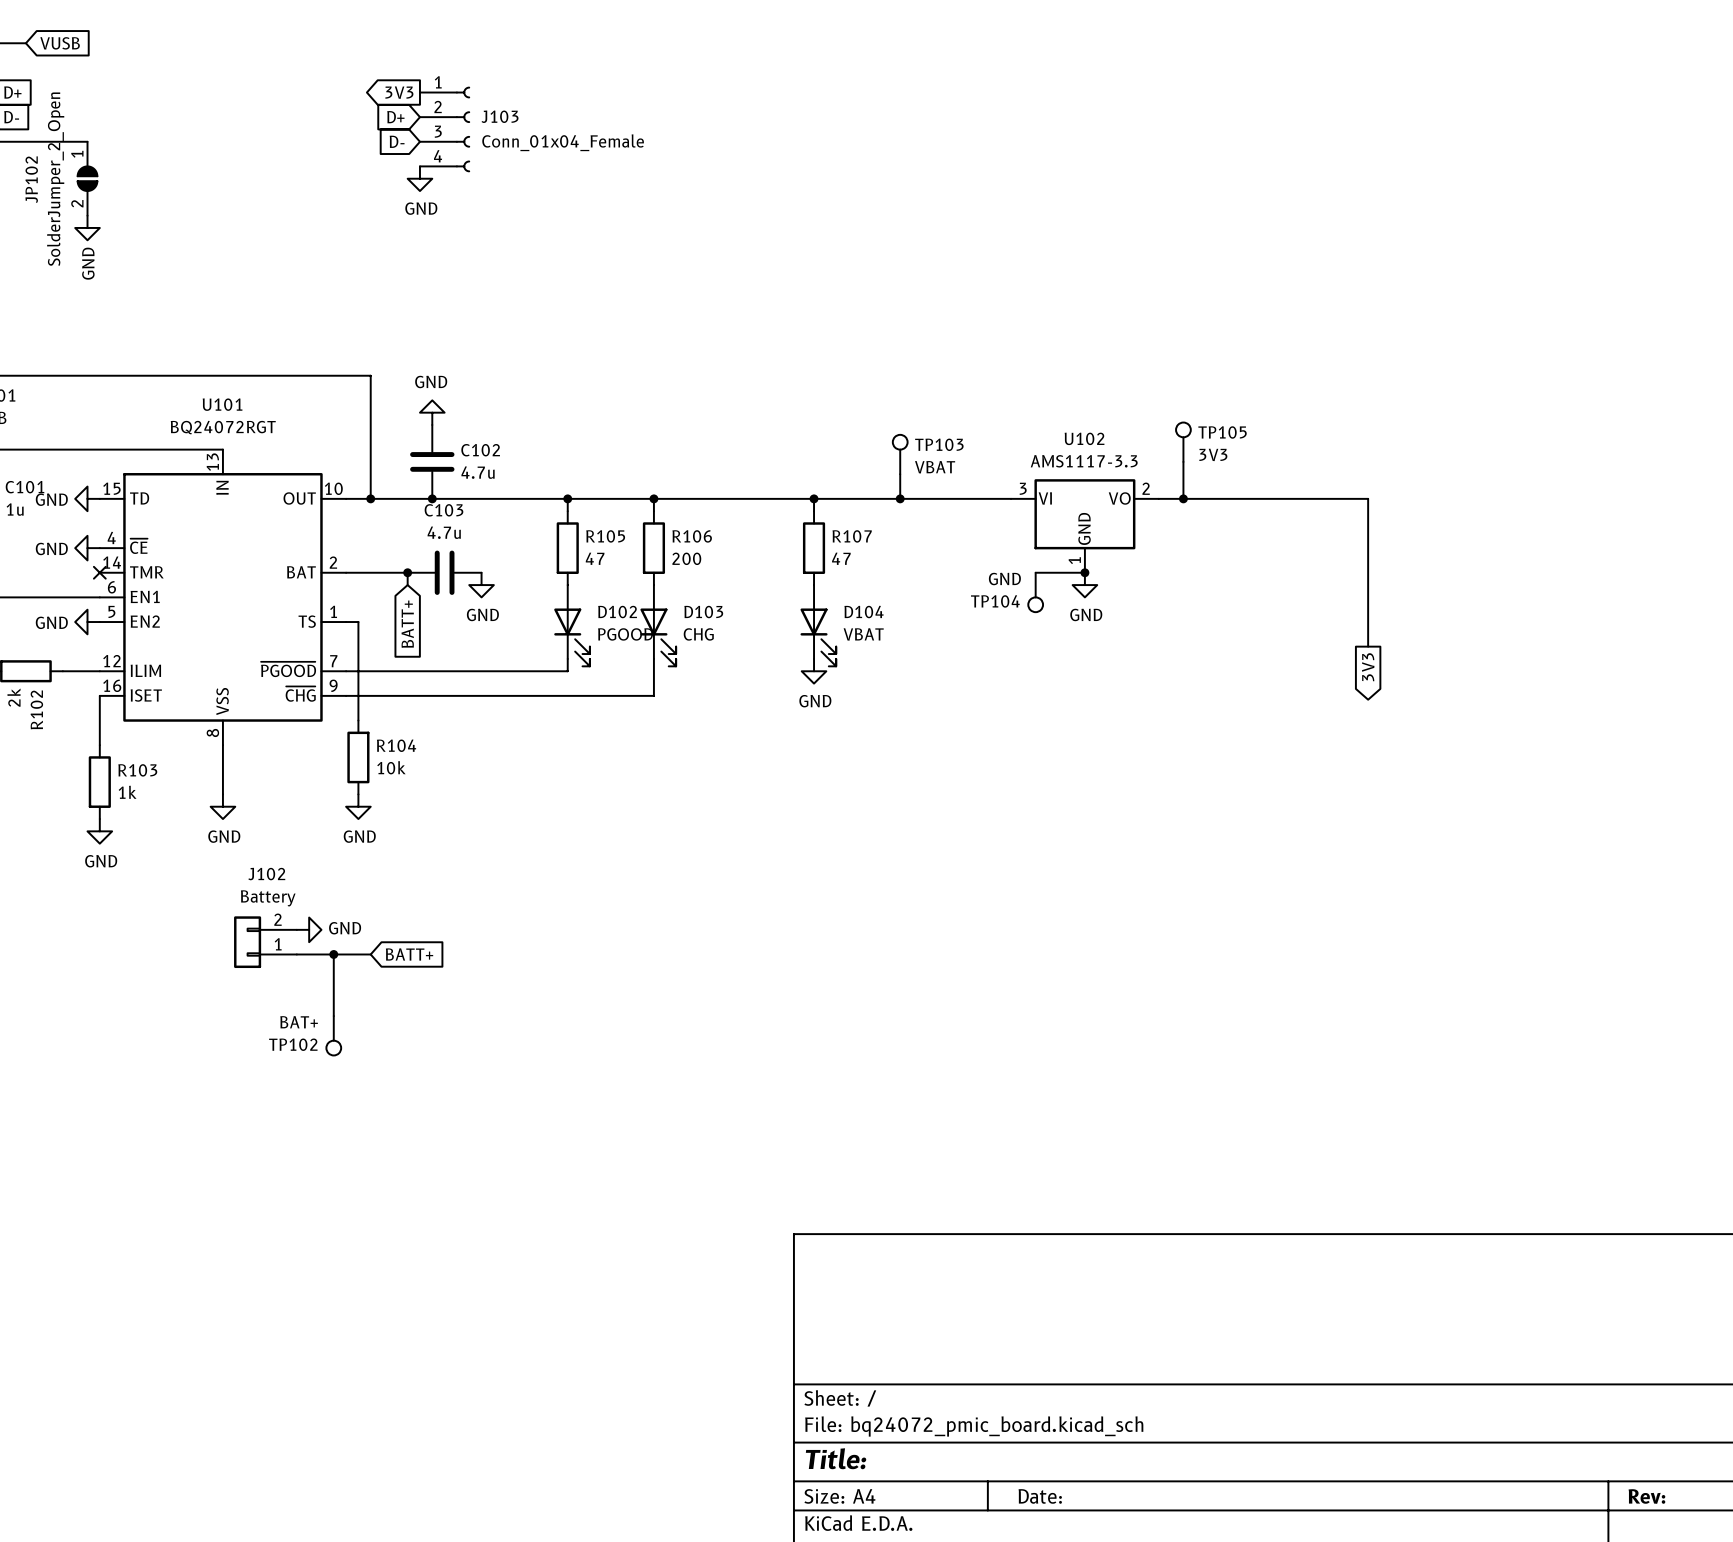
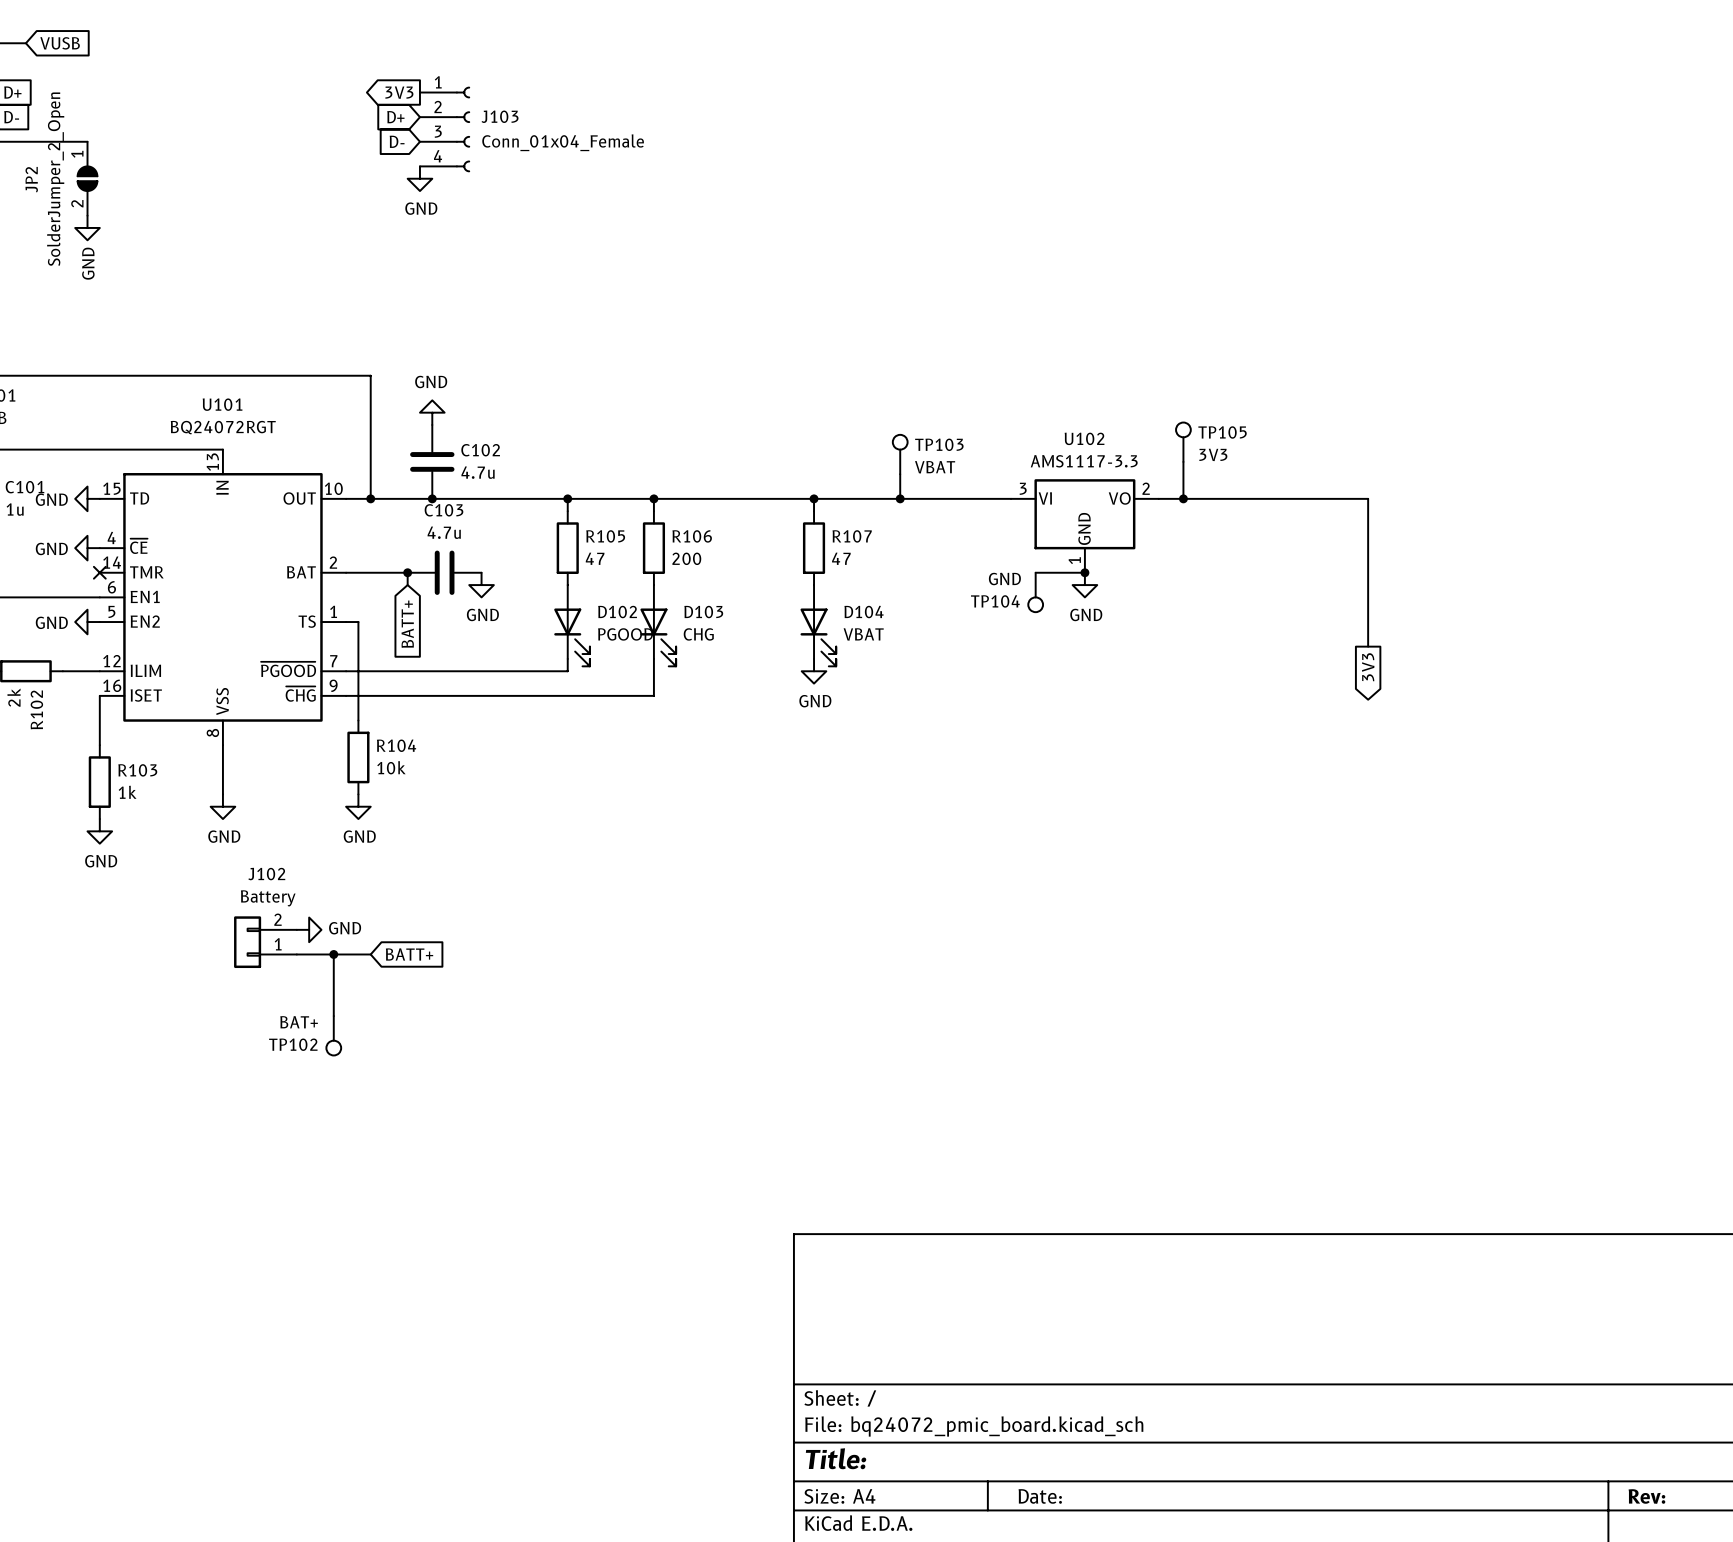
JP102 name: JP102 (31, 179) -> JP2 (31, 179)

